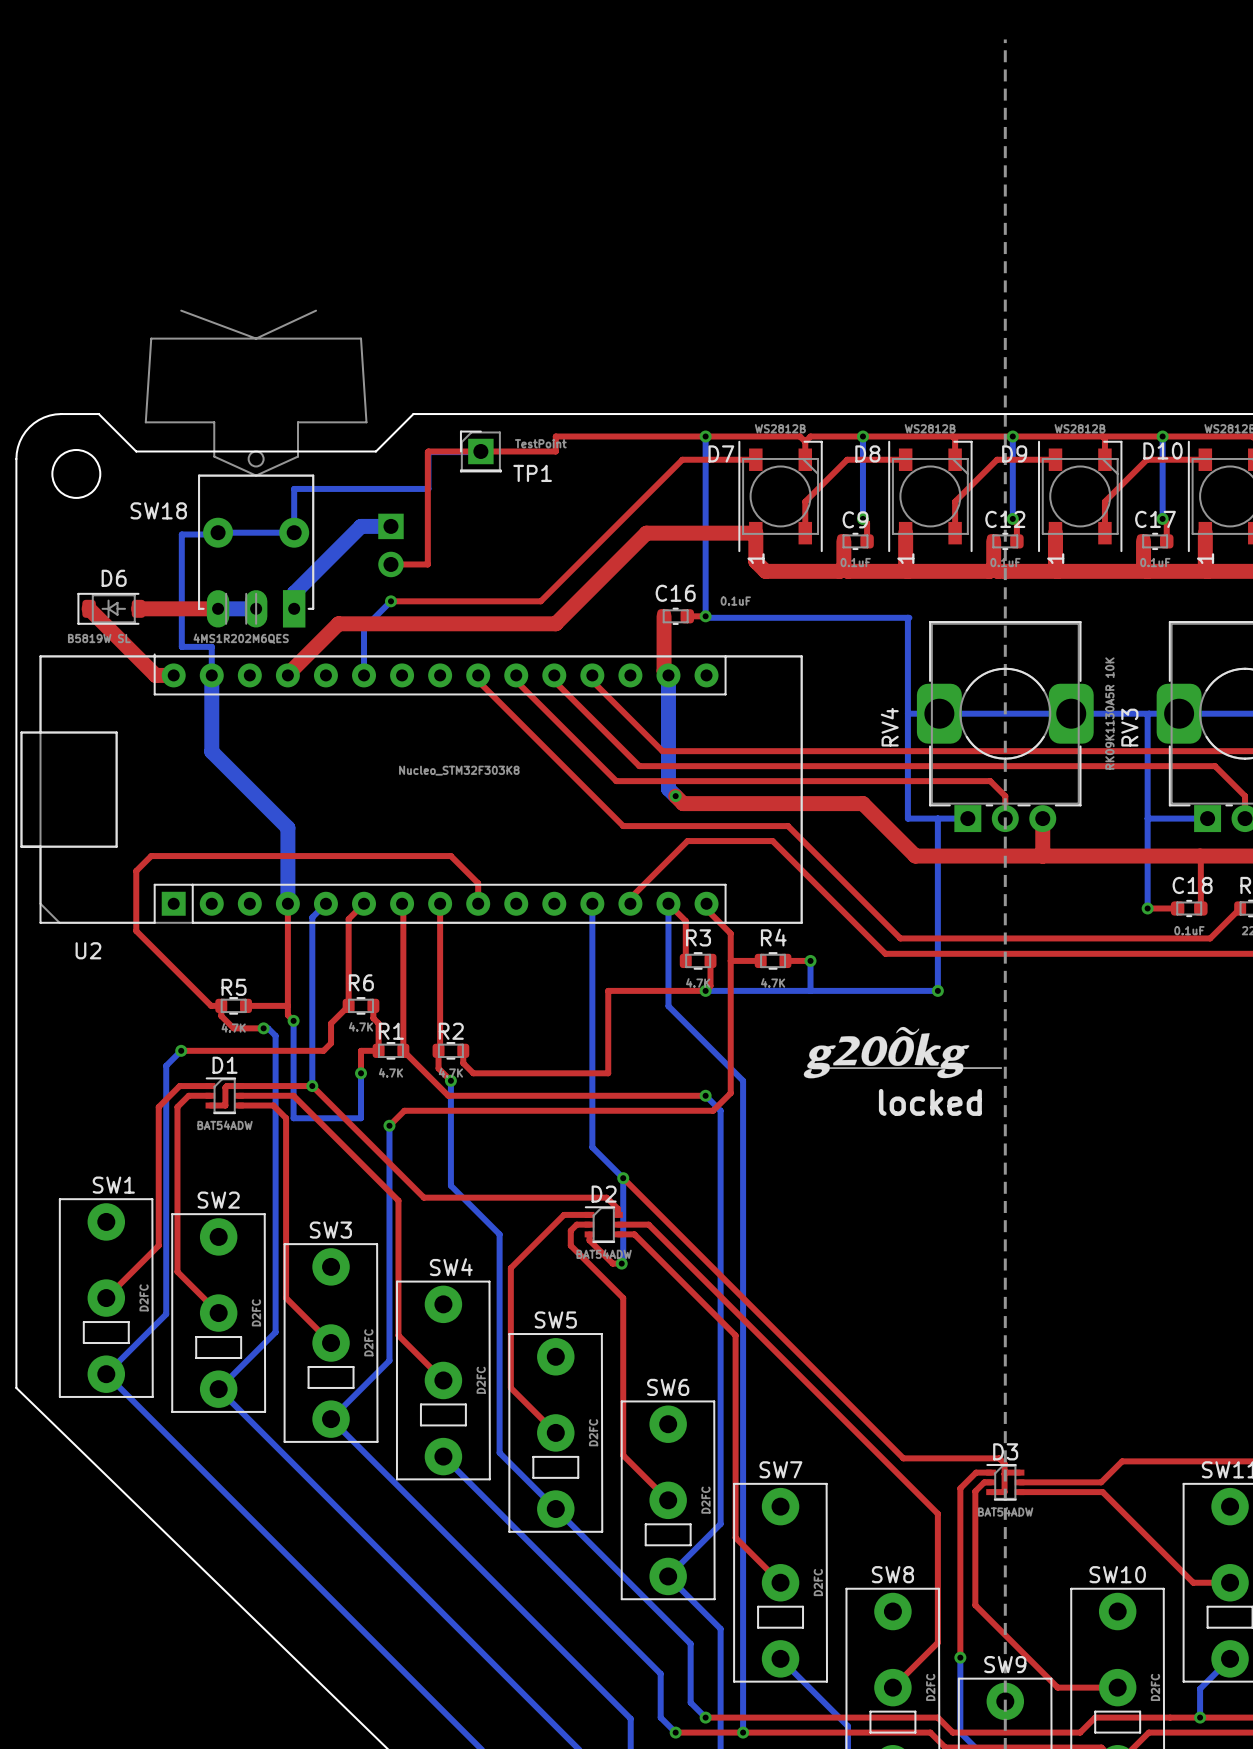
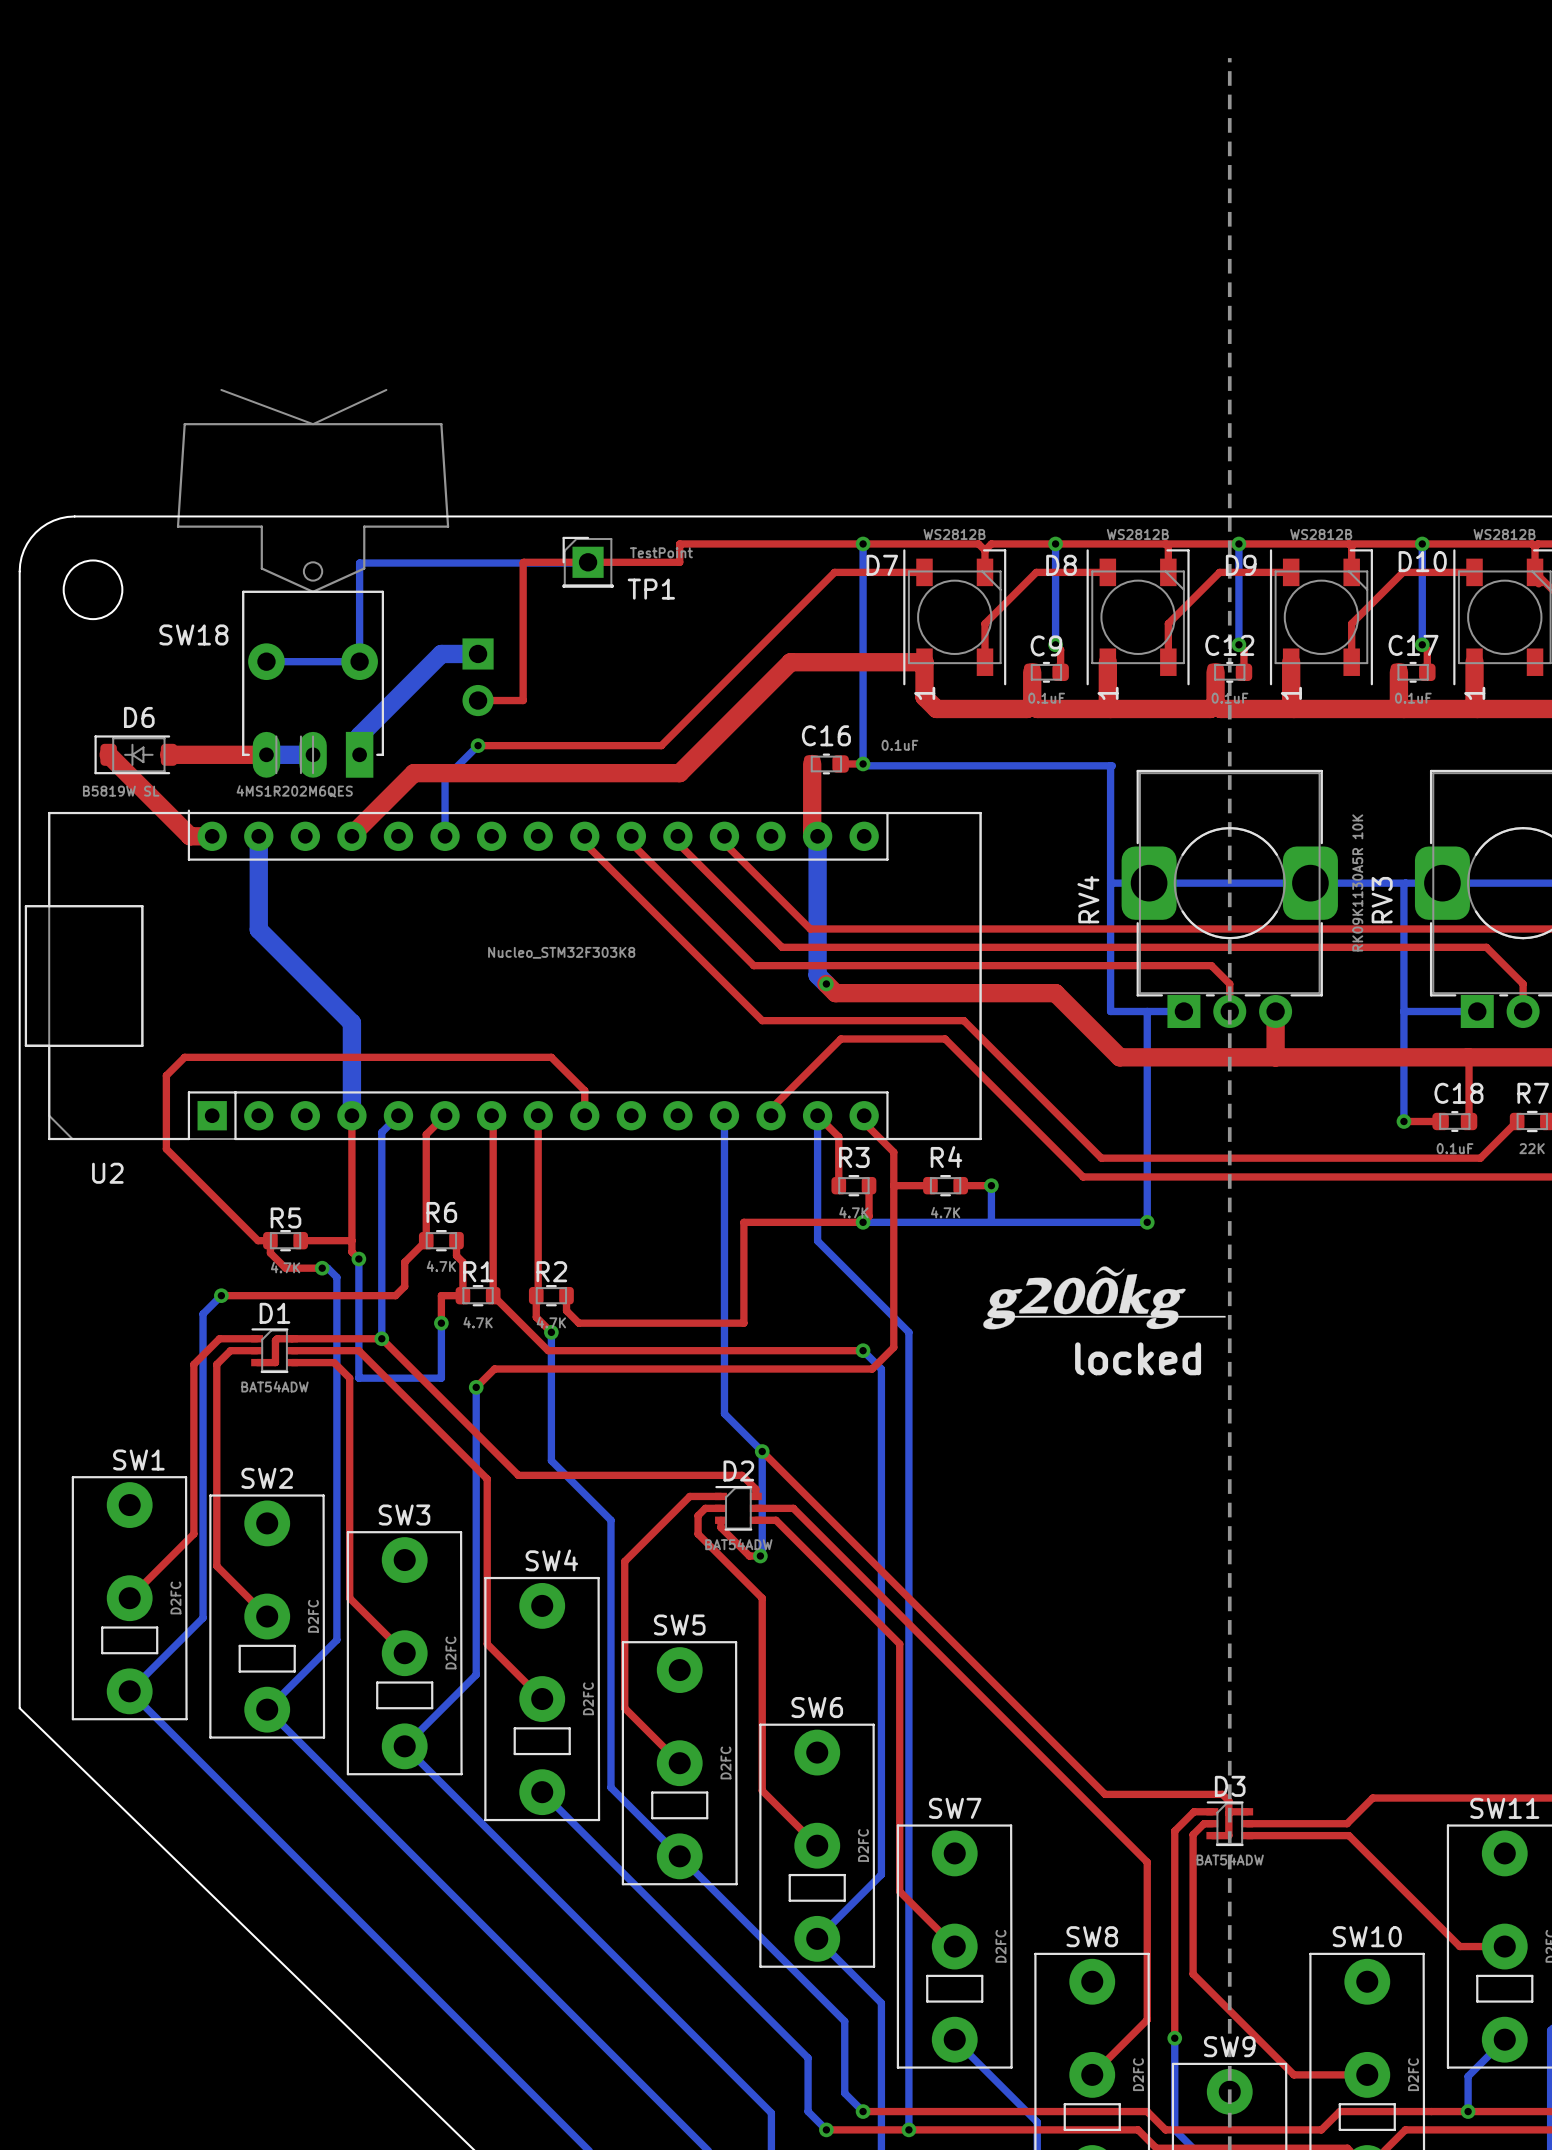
board edge: (98, 414) (136, 451) (376, 451) (413, 414) -> (120, 516) (505, 516)
bottom track: (428, 452) (428, 488) (294, 488) -> (523, 563) (359, 563) (359, 608)
bottom track: (218, 532) (216, 534) (181, 534) (181, 646) (211, 646) (211, 675) -> none

